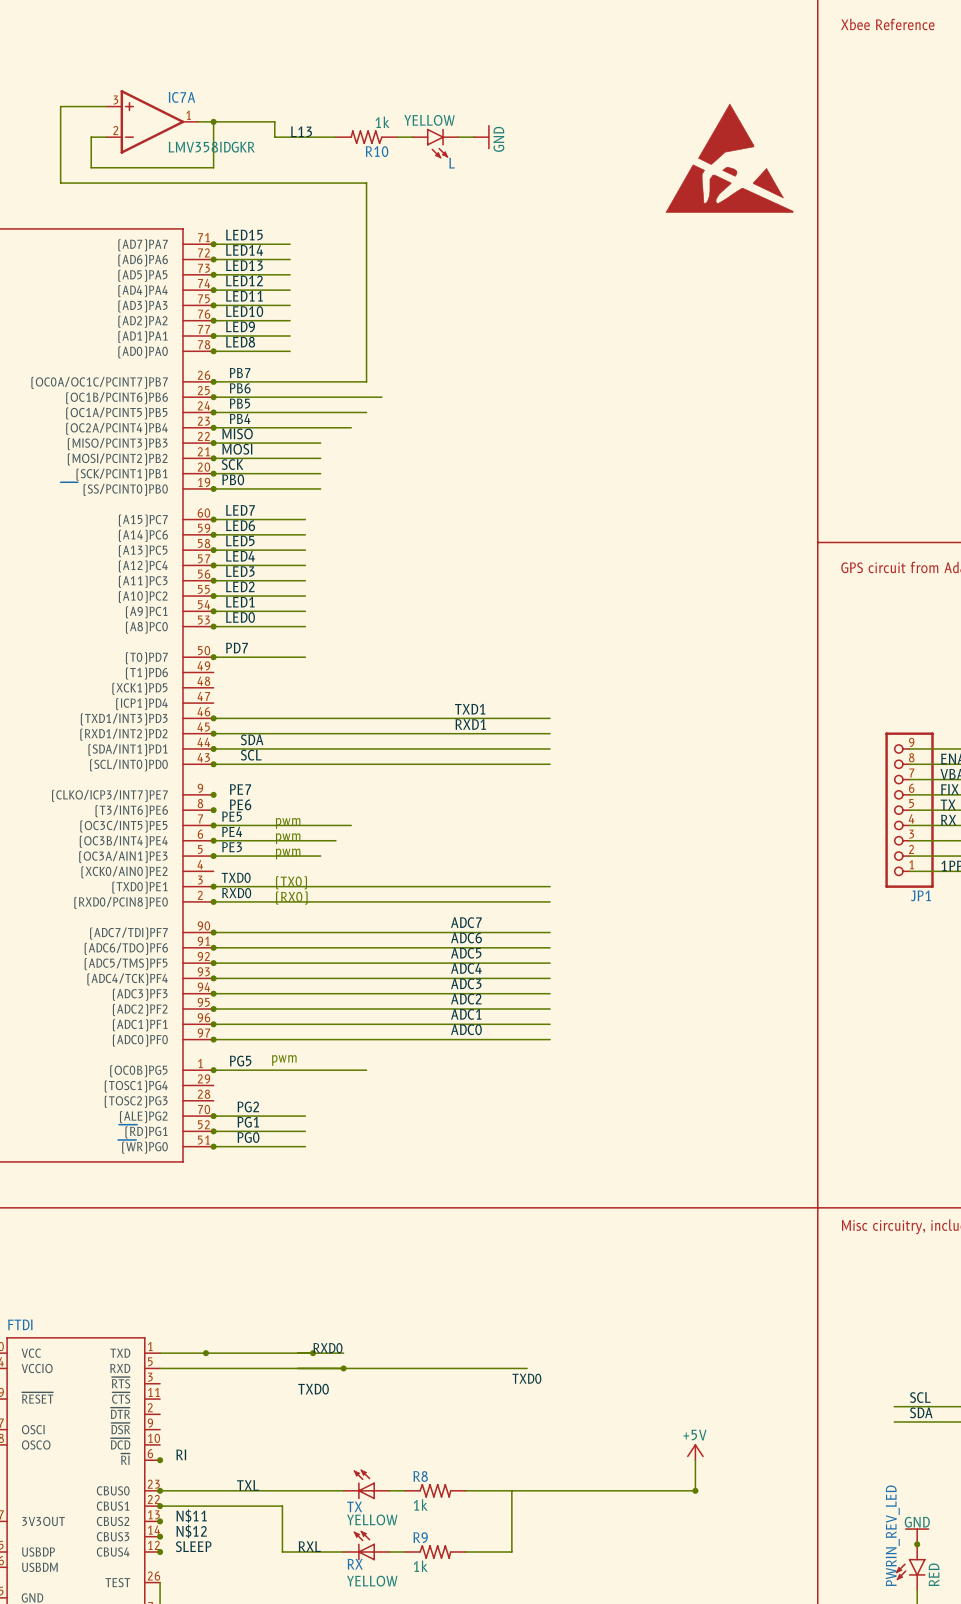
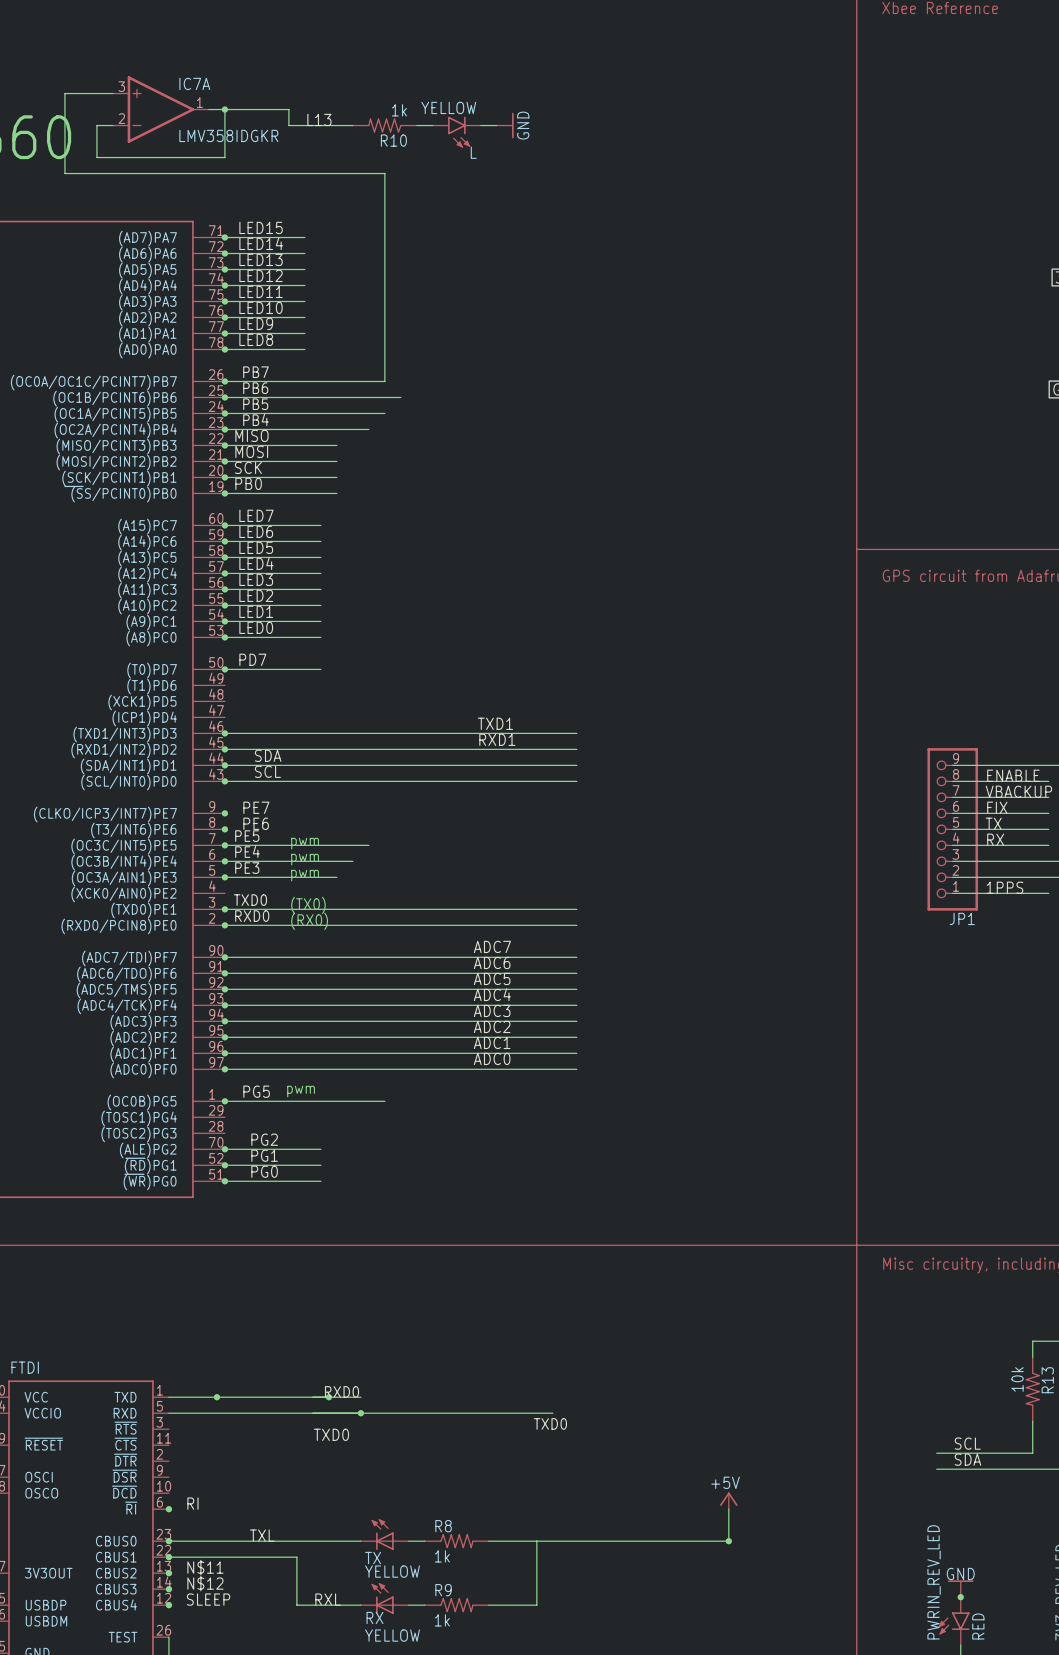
part: (729, 158) -> none

